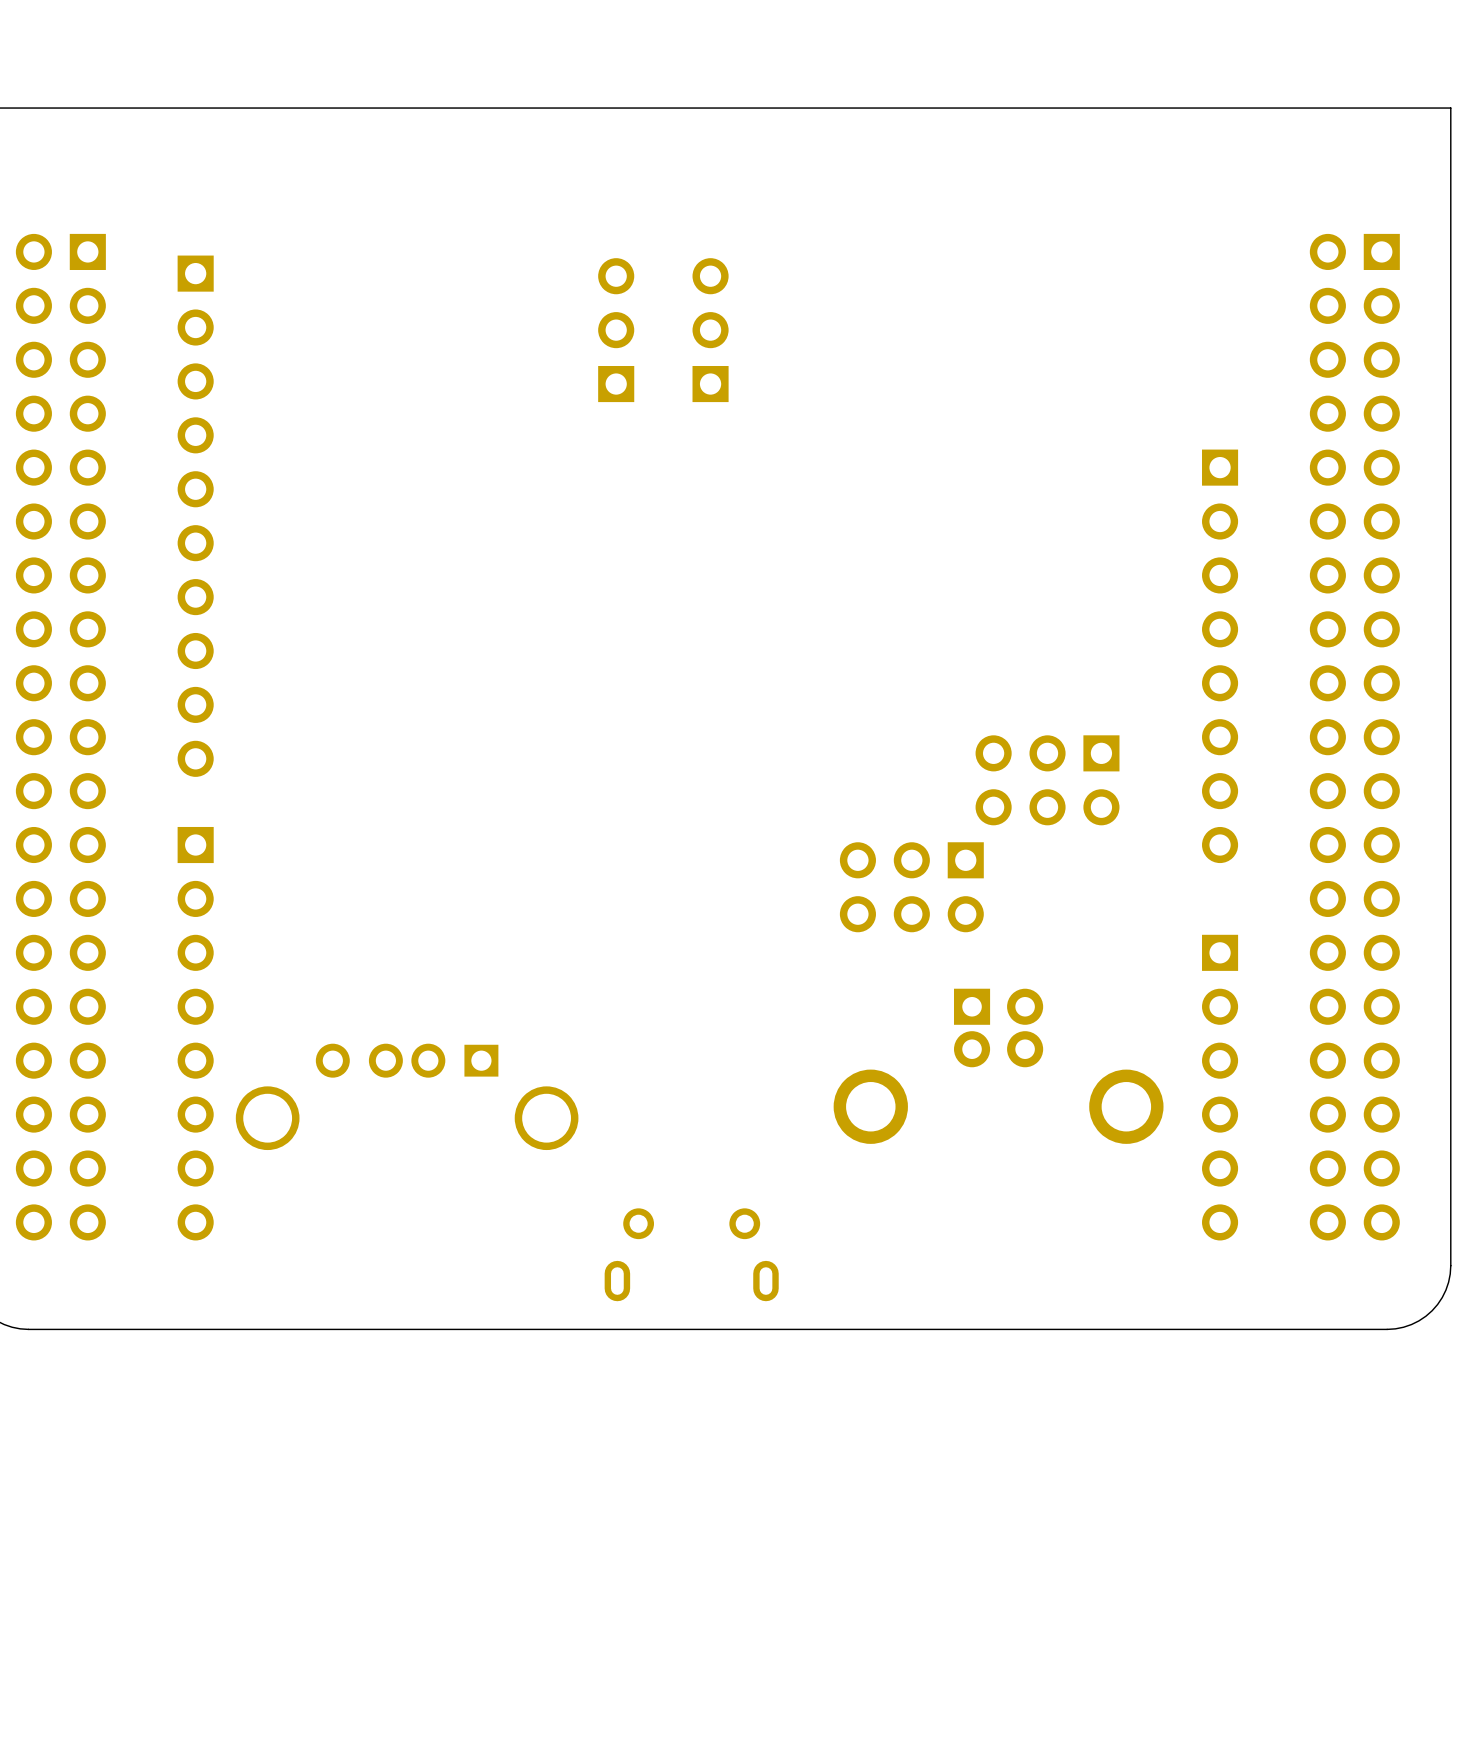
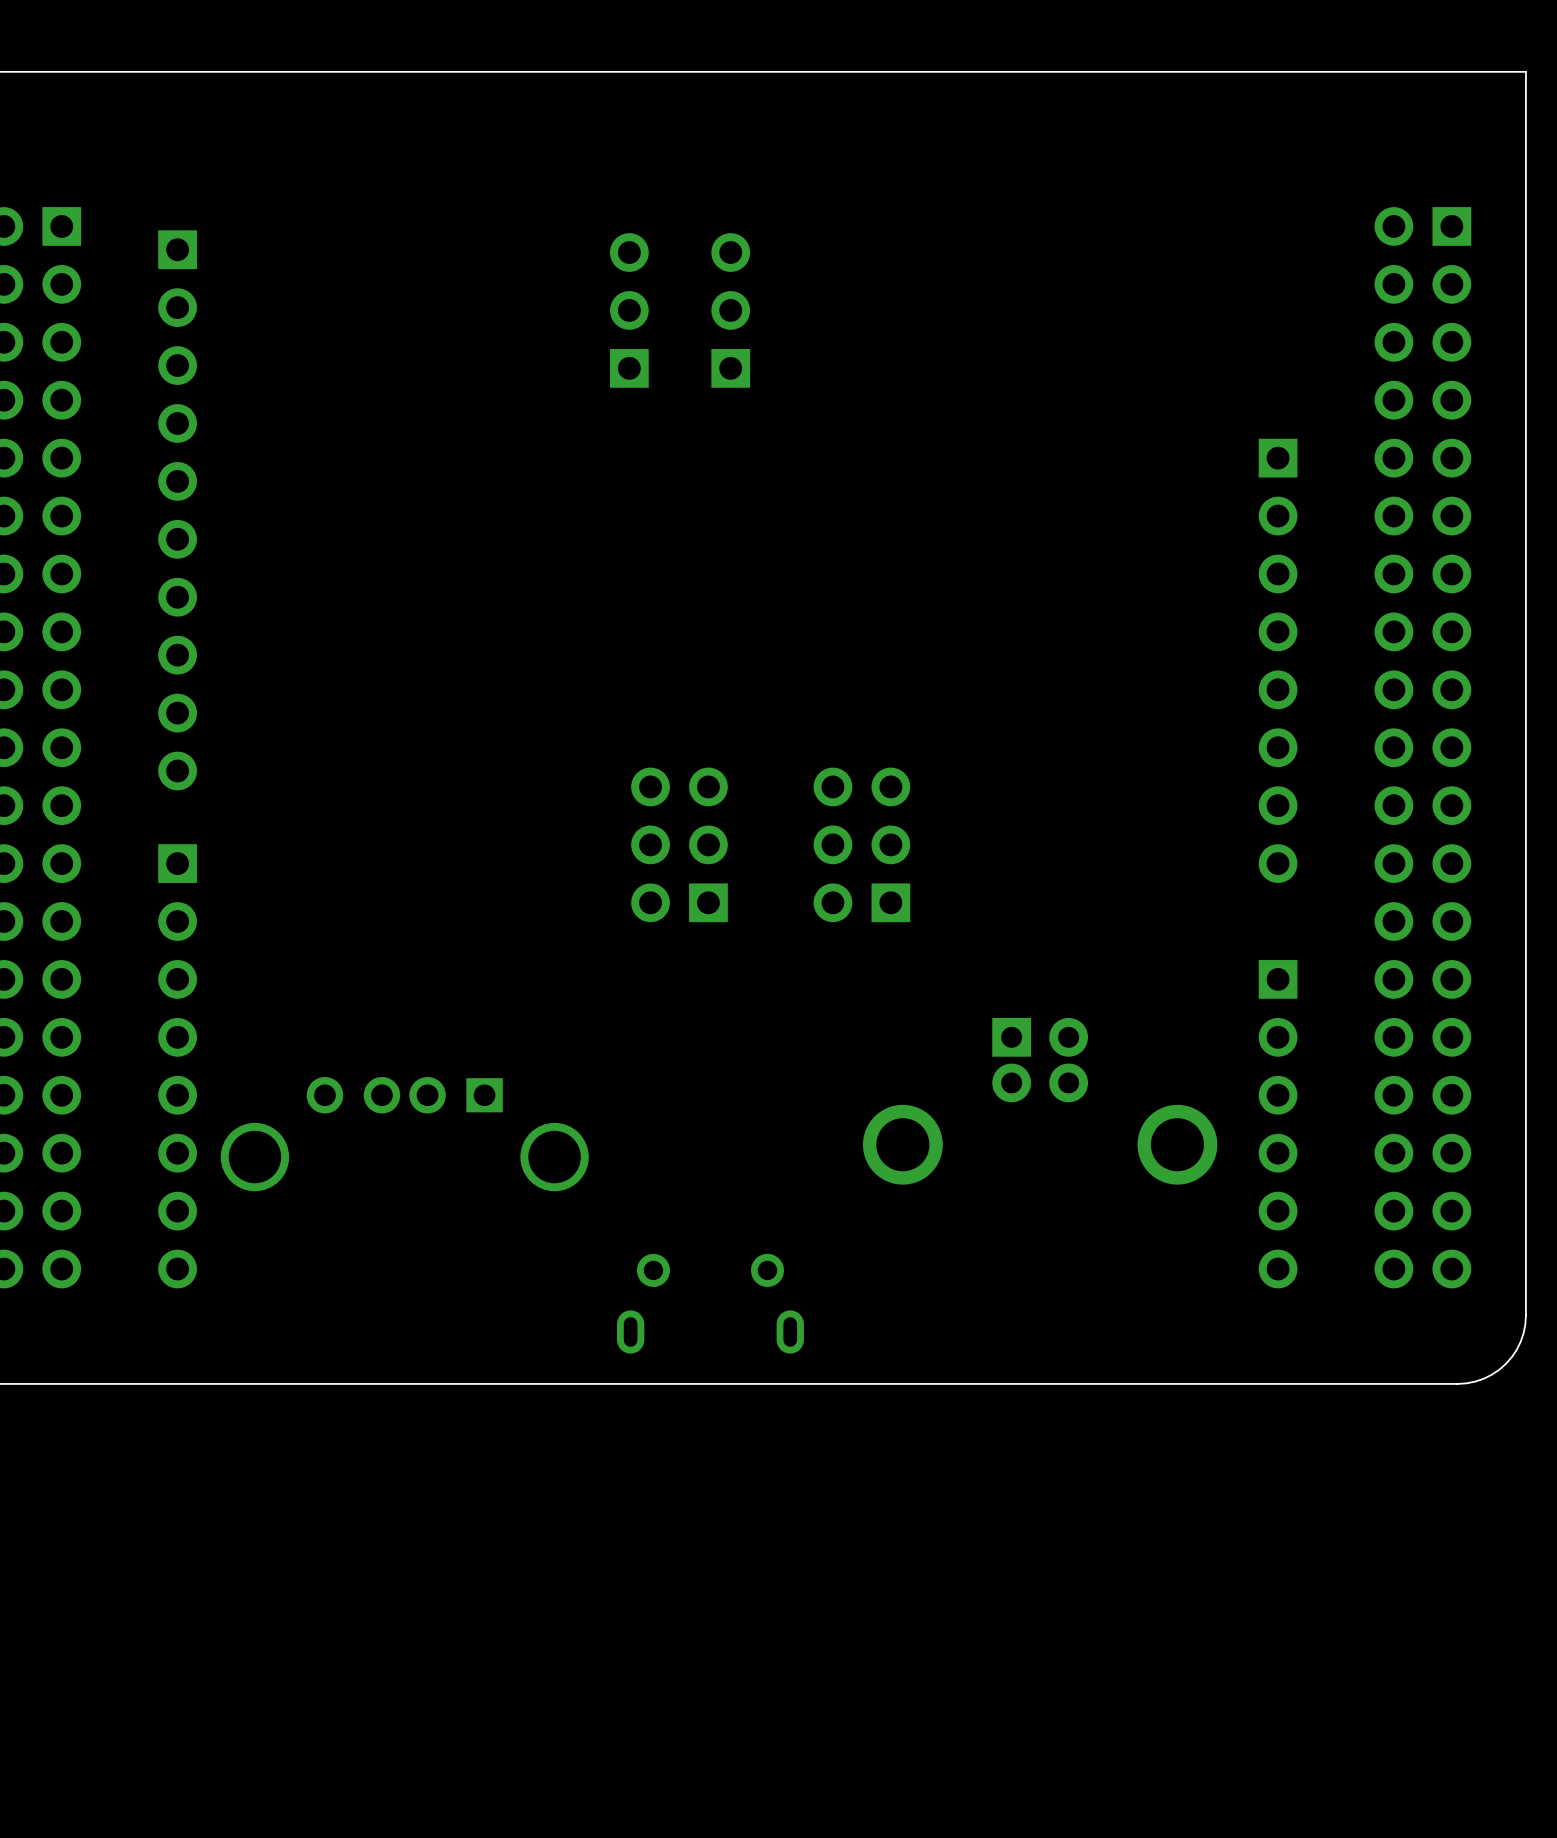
part: (1047, 780) -> none
part: none -> (679, 844)
part rotation: 0° (911, 887) -> 90° clockwise (861, 844)
part position: (911, 887) -> (861, 844)

